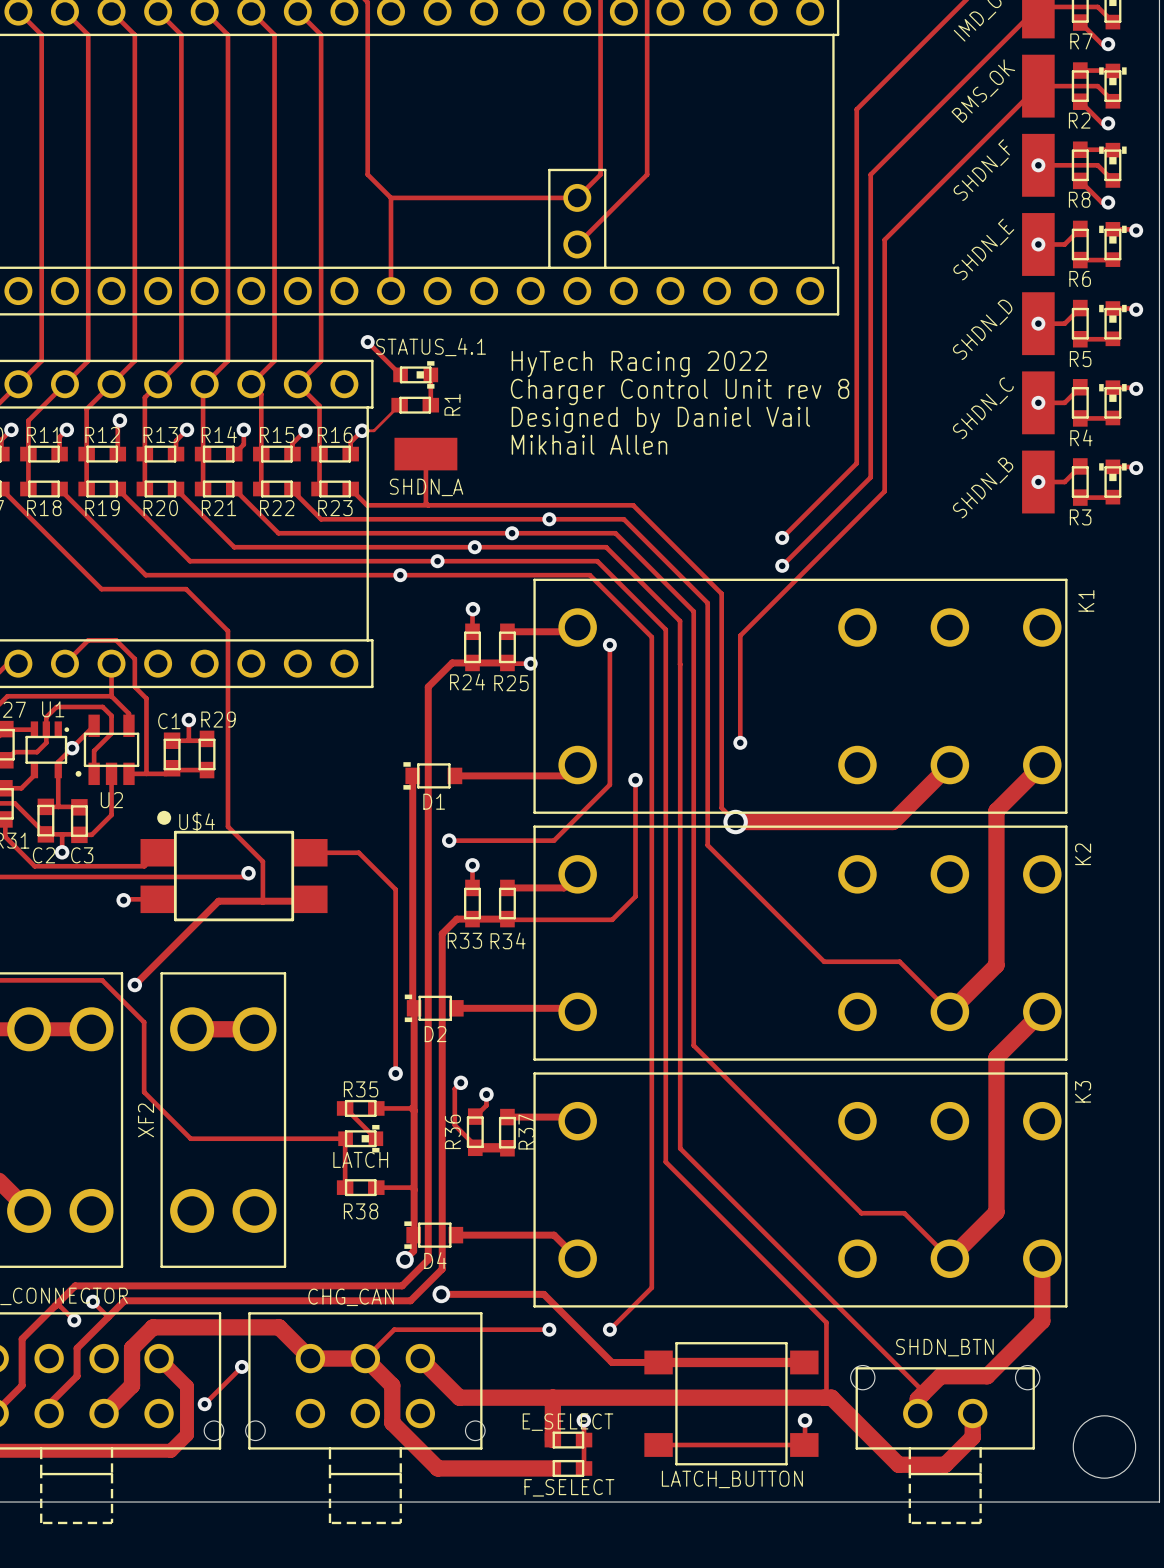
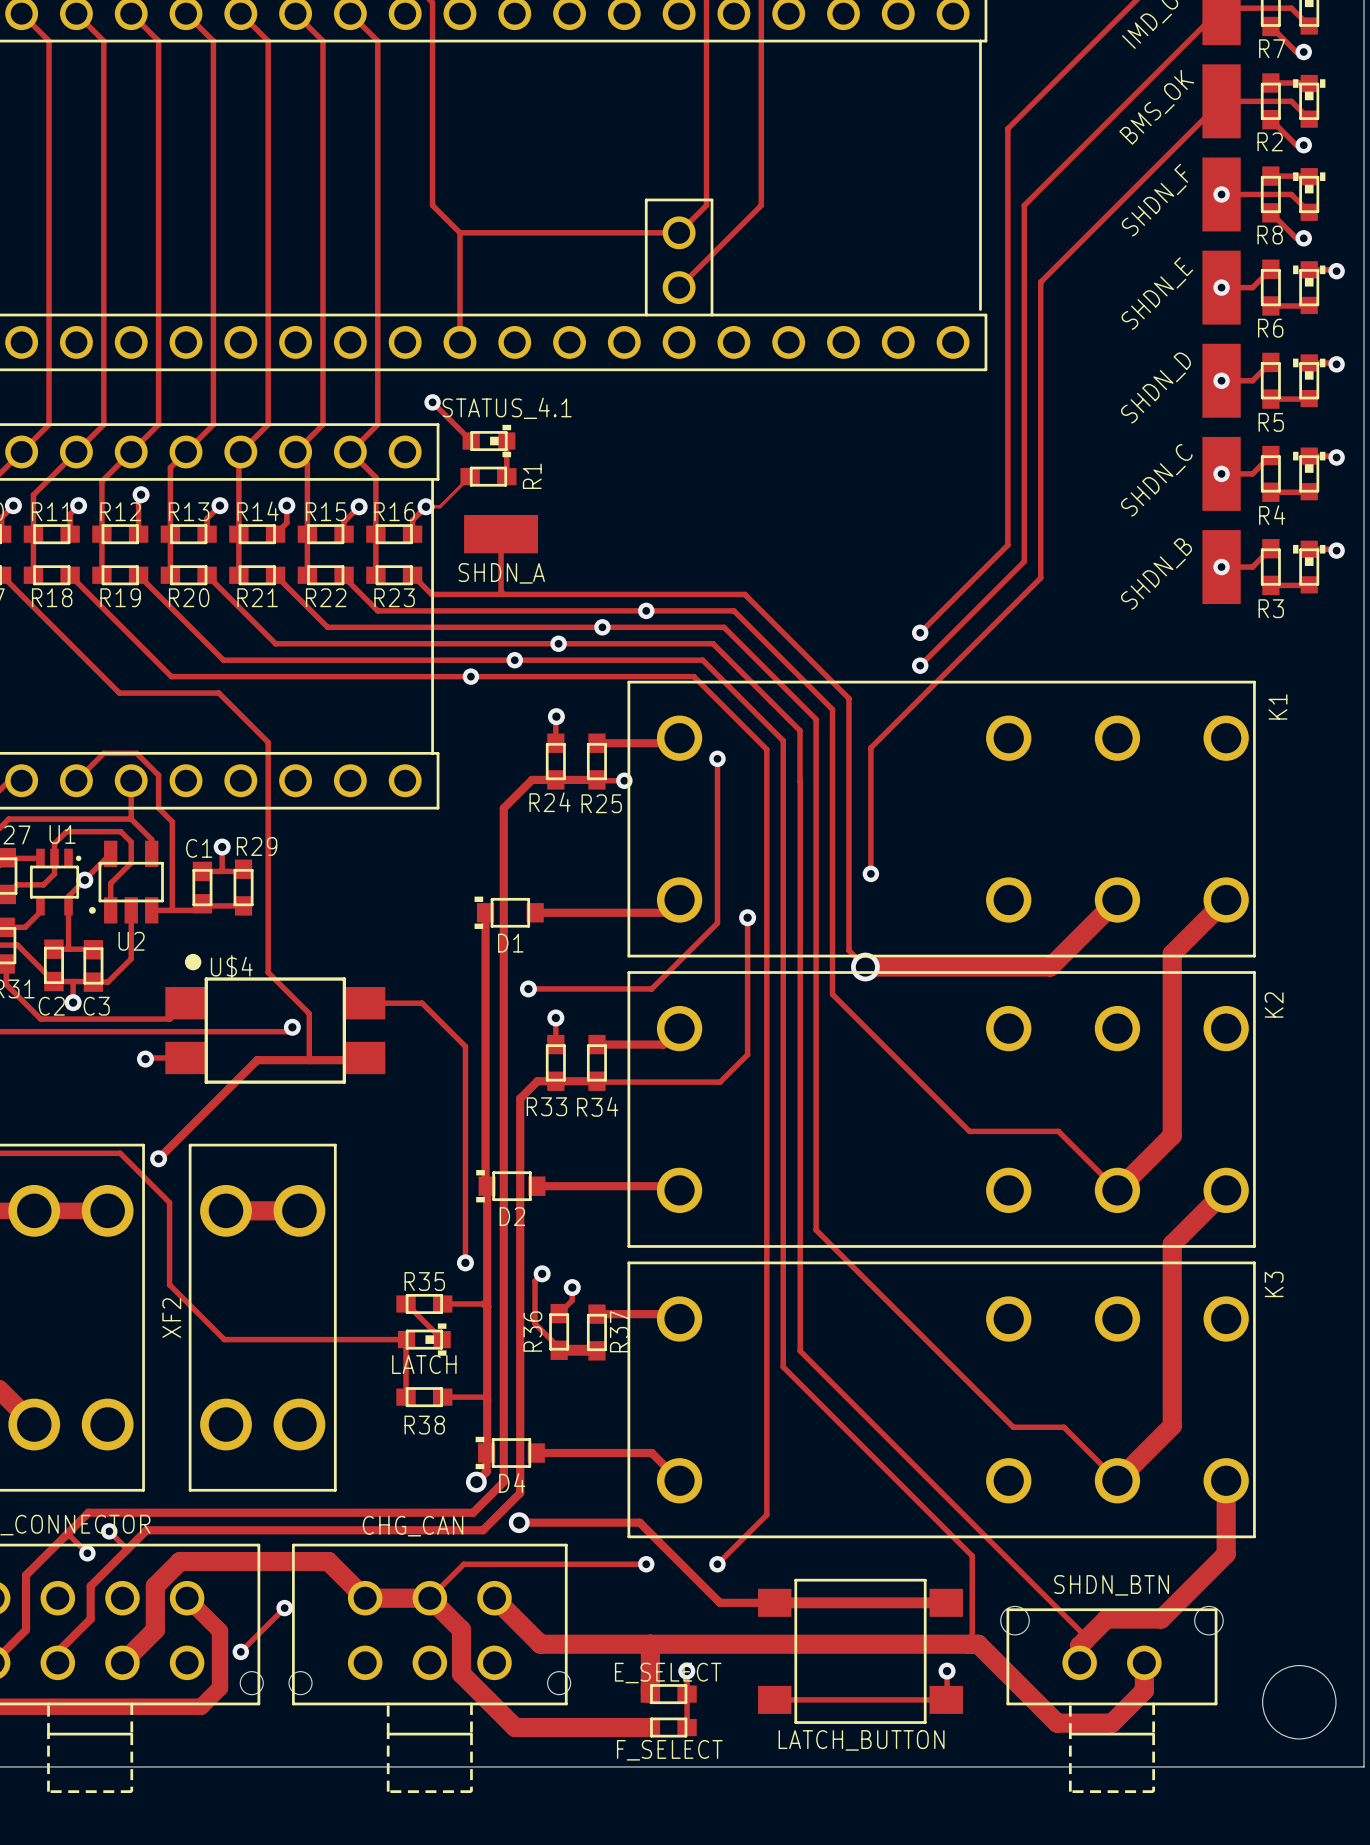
text: HyTech Racing 2022 (639, 364) -> none
text: Charger Control Unit rev 8 (680, 391) -> none
text: Designed by Daniel Vail (660, 419) -> none
text: Mikhail Allen (589, 444) -> none

